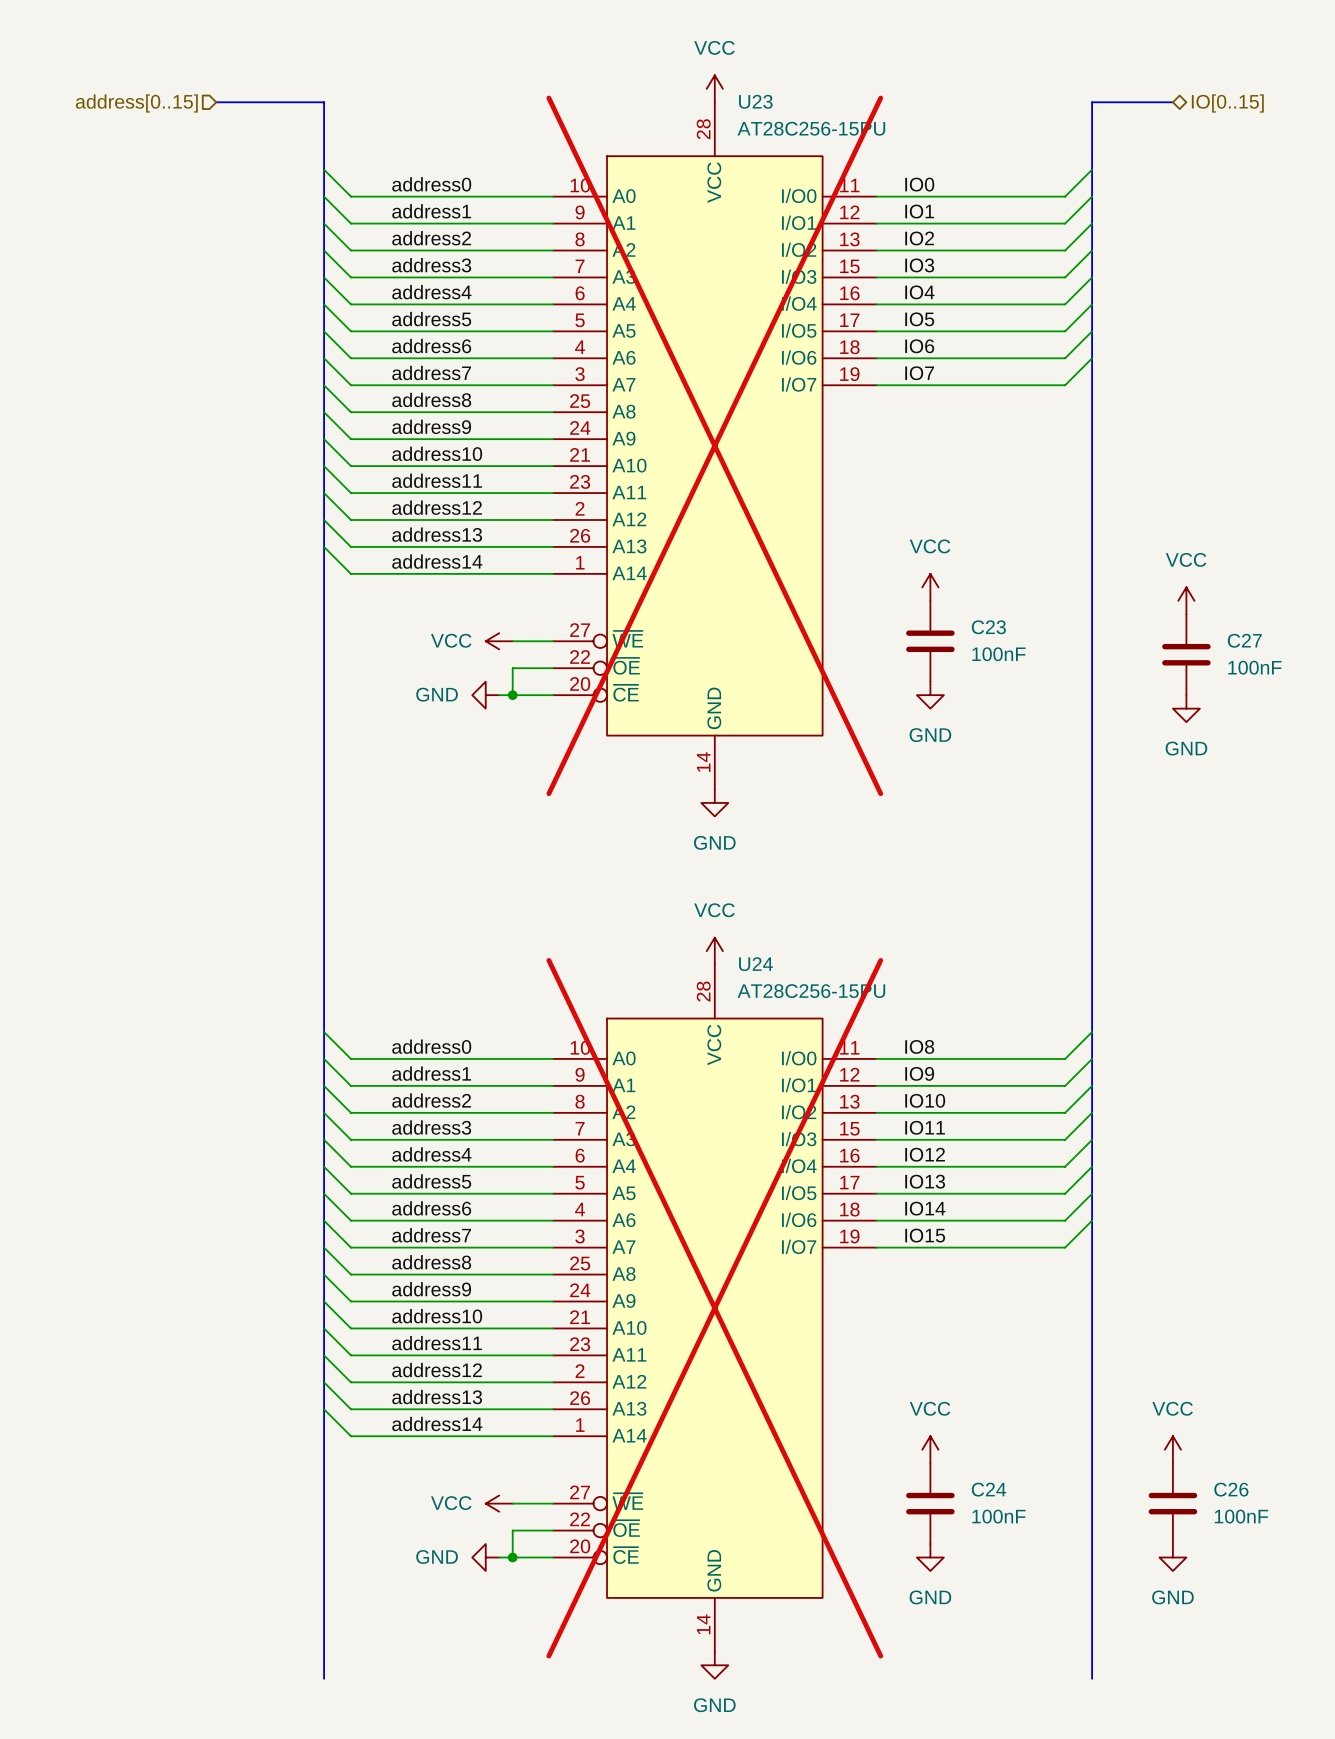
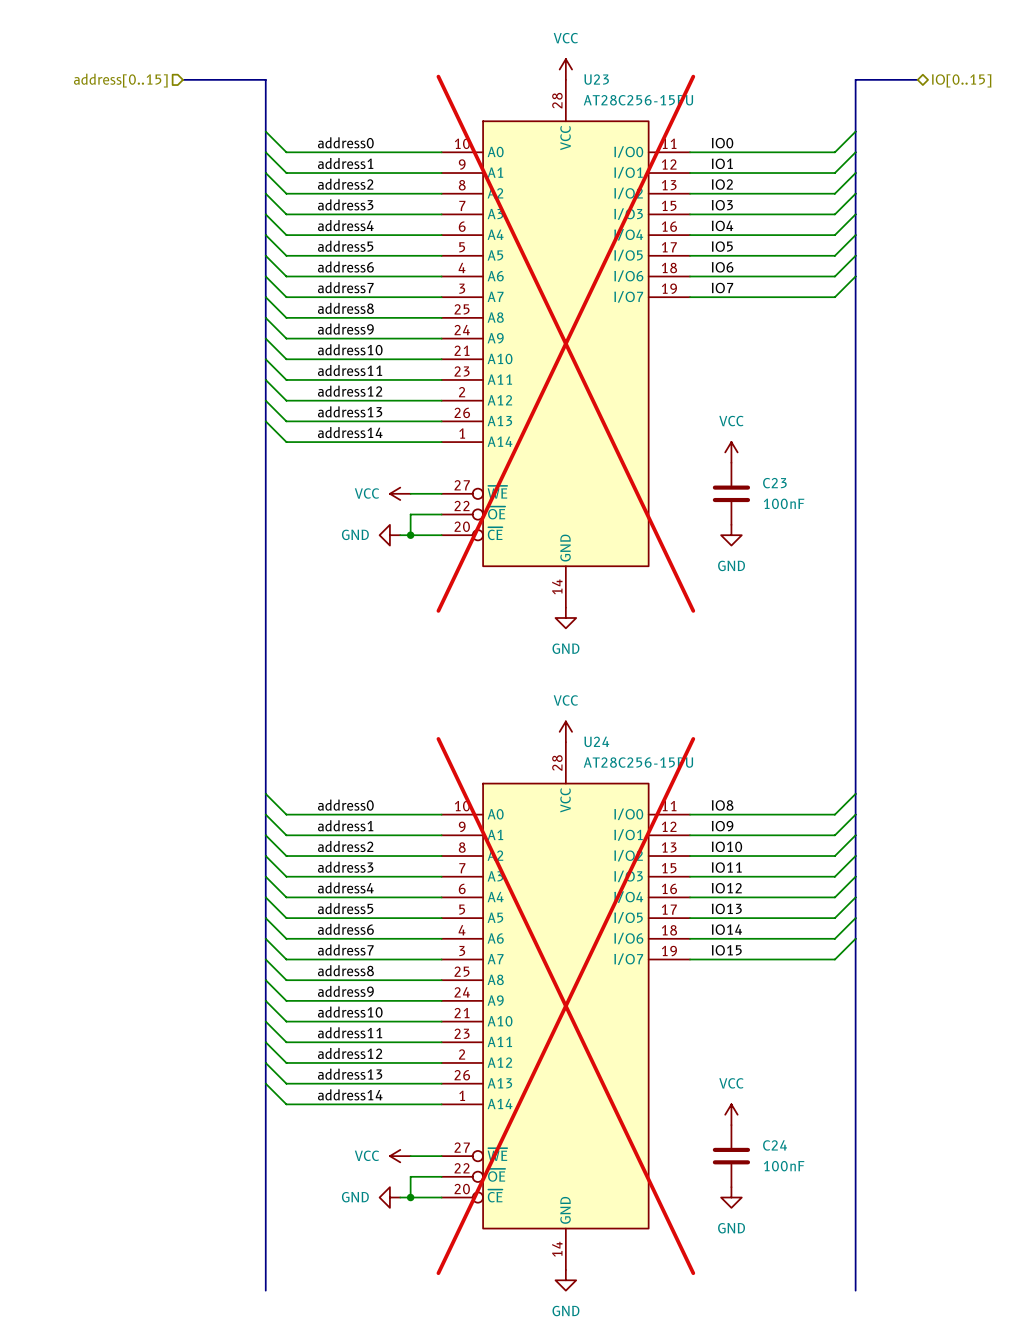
power symbol: VCC (1186, 600) -> none
C27: 100nF (1186, 654) -> none
power symbol: GND (1186, 708) -> none
power symbol: VCC (1172, 1449) -> none
C26: 100nF (1172, 1503) -> none
power symbol: GND (1172, 1557) -> none

